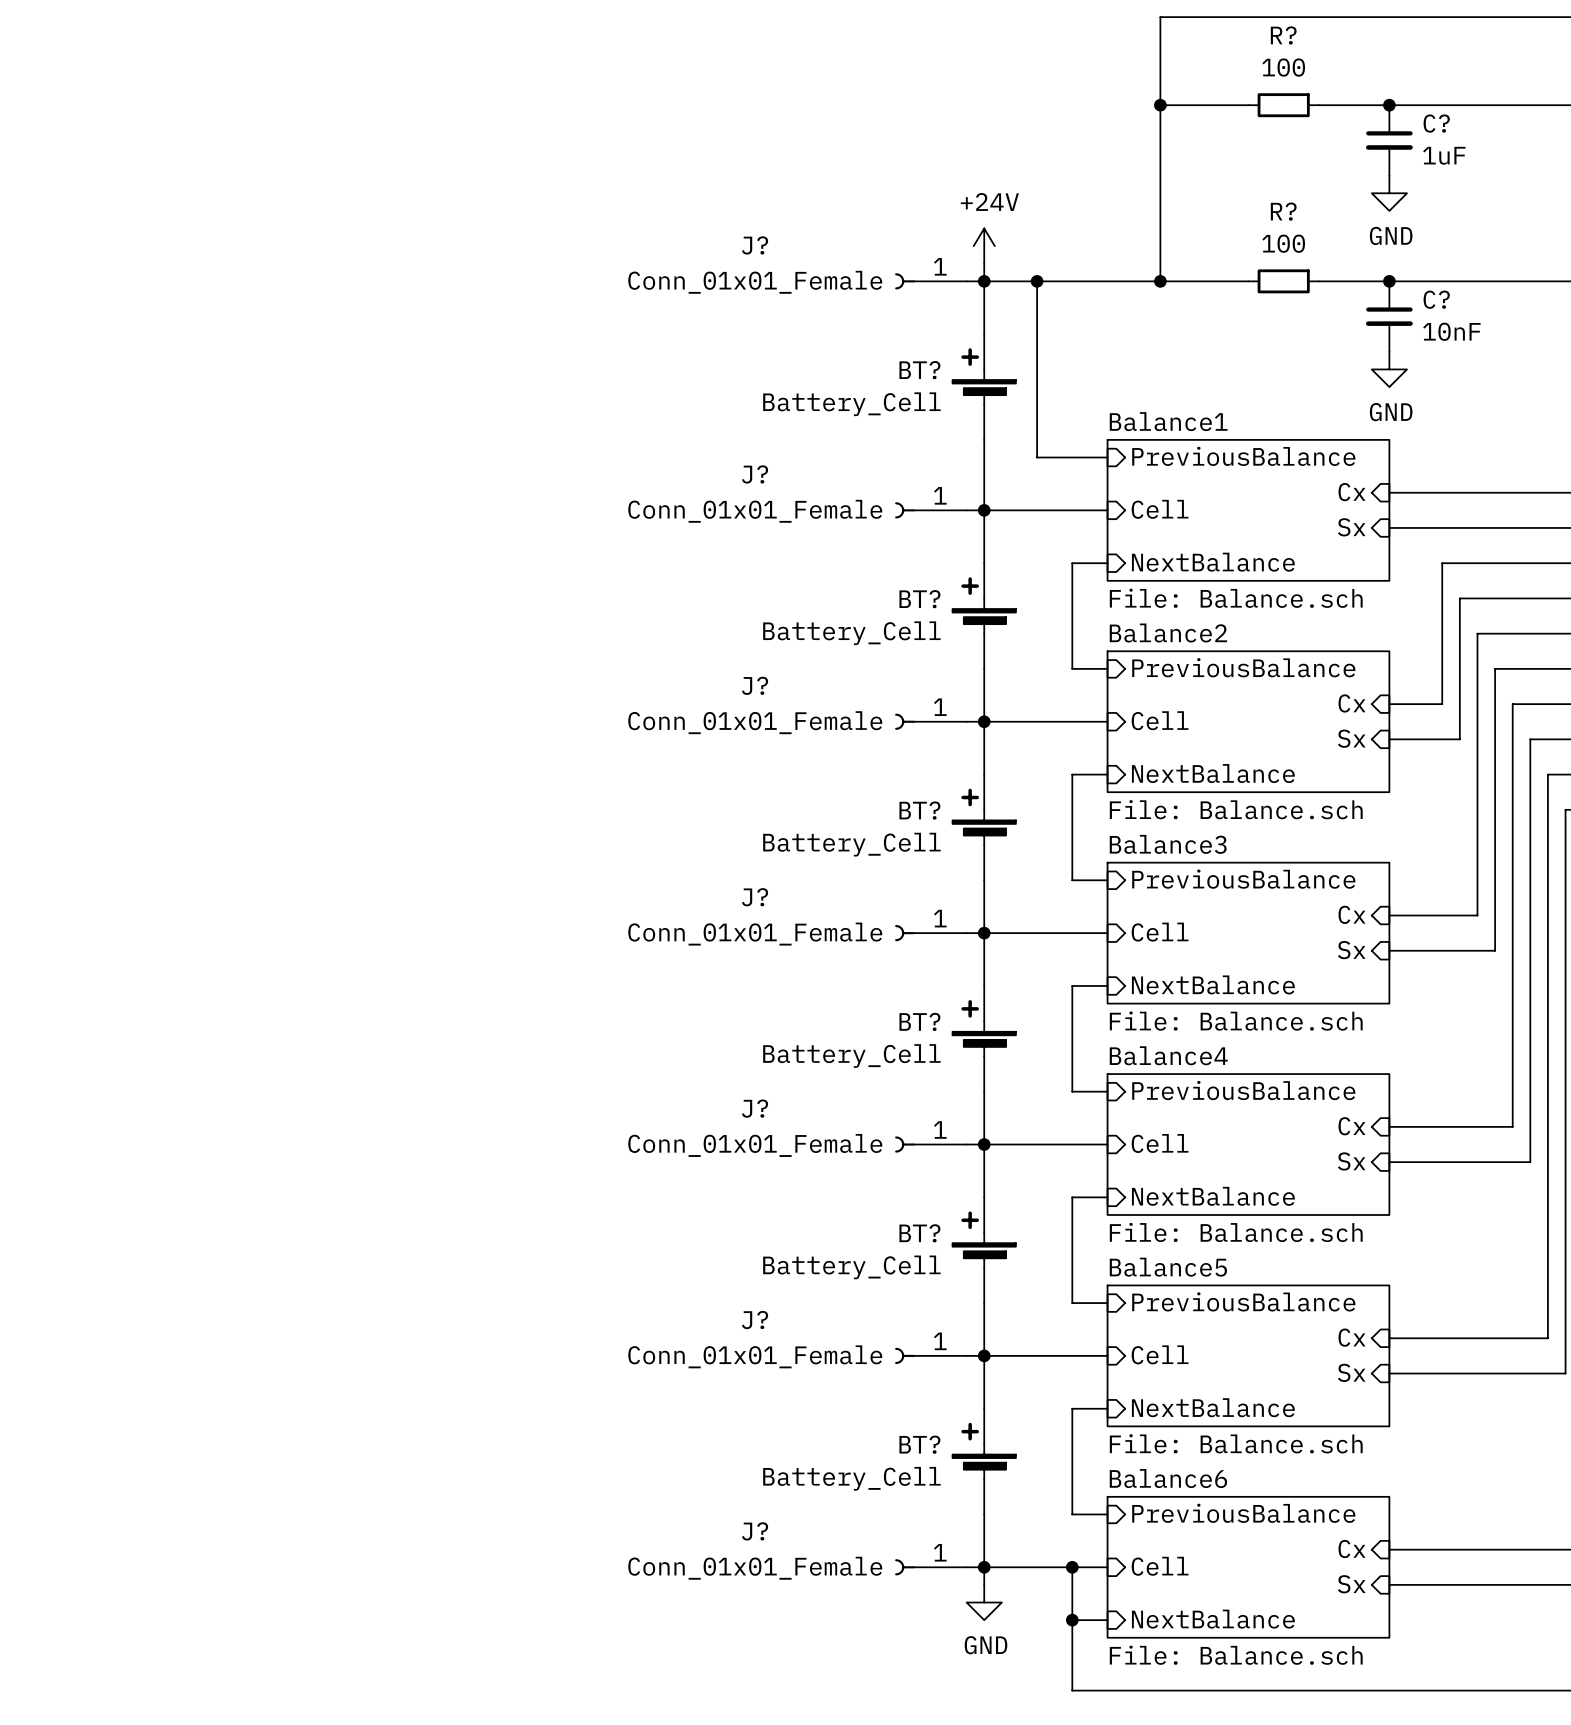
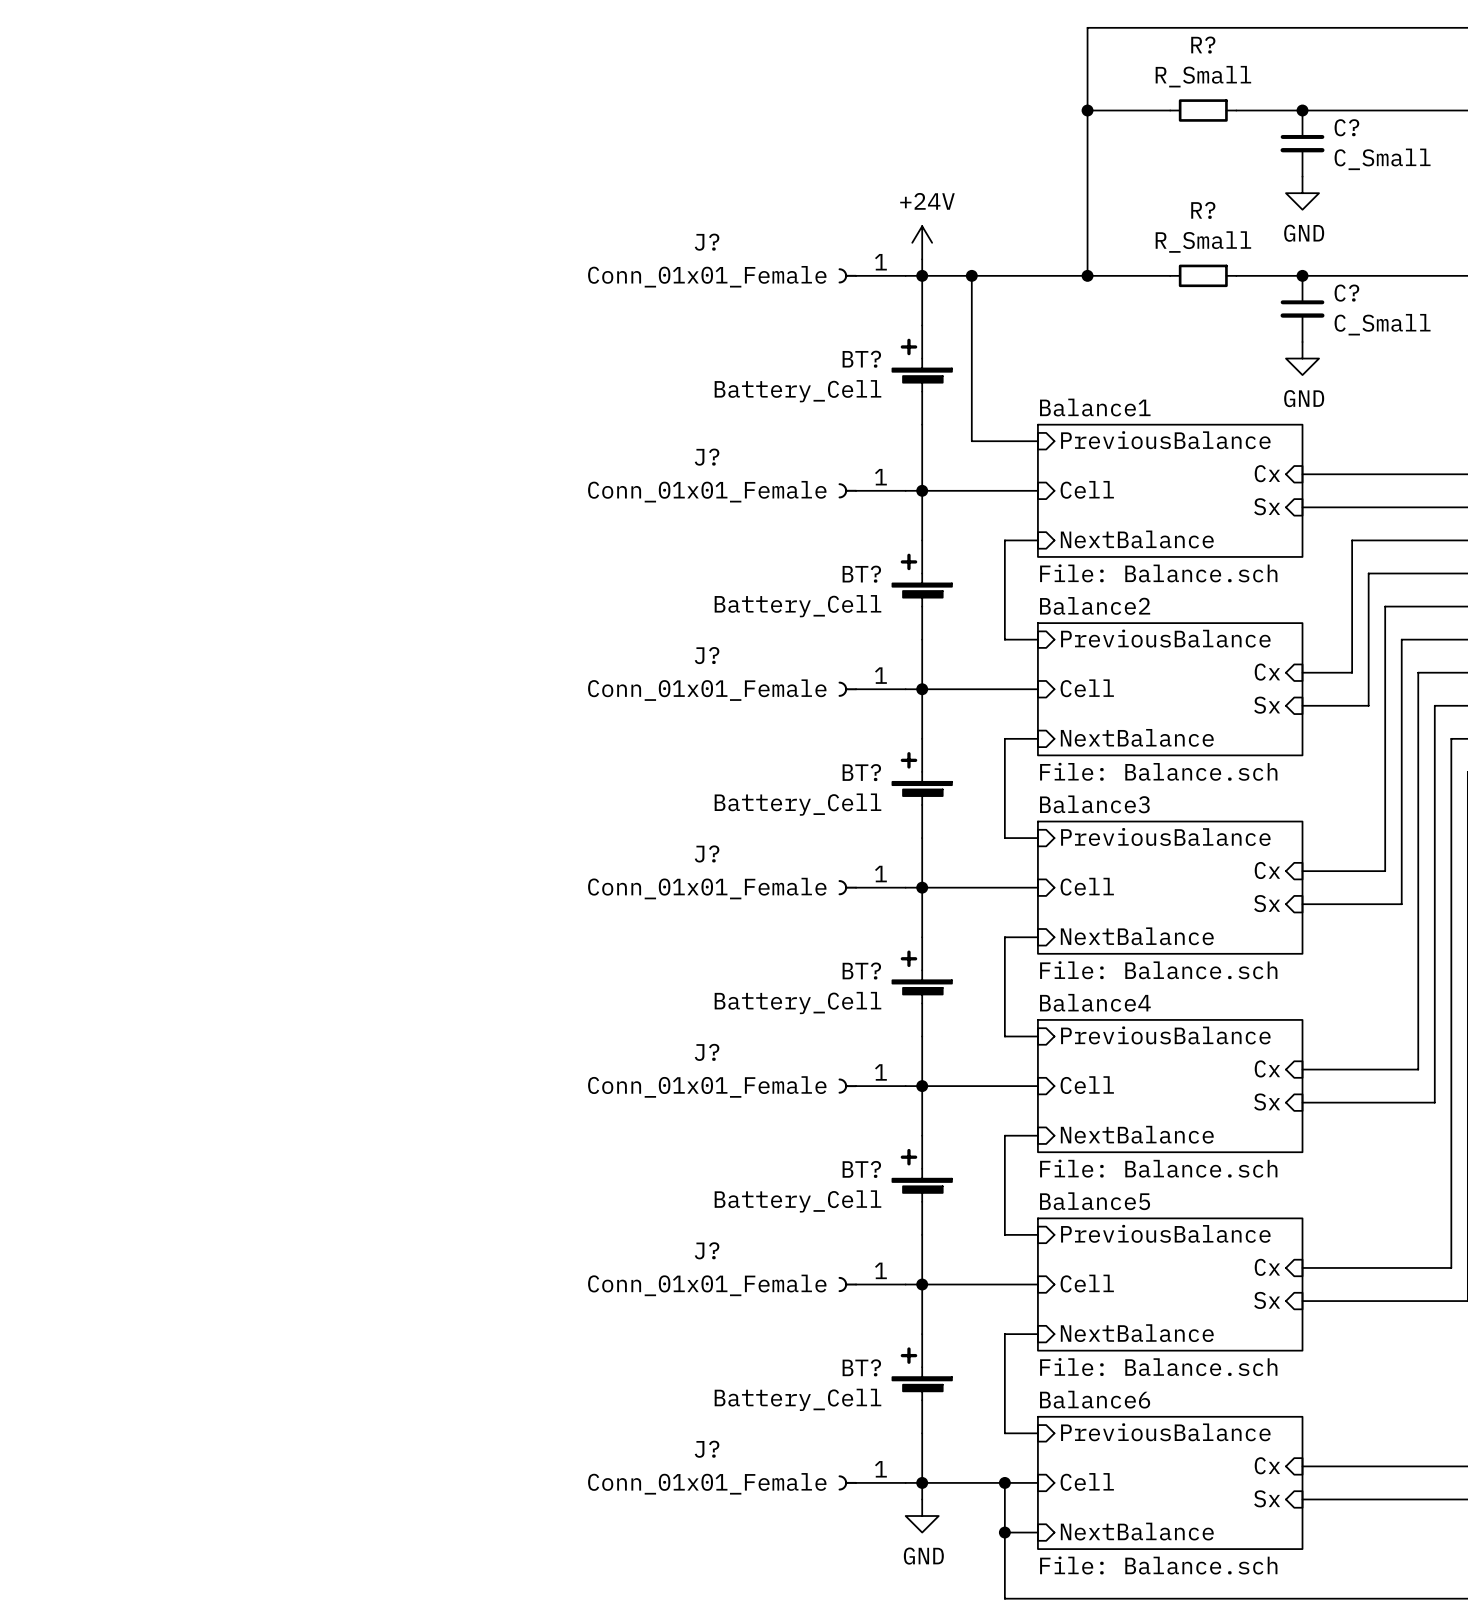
R? value: 100 (1283, 67) -> R_Small (1203, 76)
C? value: 1uF (1444, 155) -> C_Small (1382, 159)
R? value: 100 (1283, 243) -> R_Small (1203, 242)
C? value: 10nF (1451, 331) -> C_Small (1382, 324)

